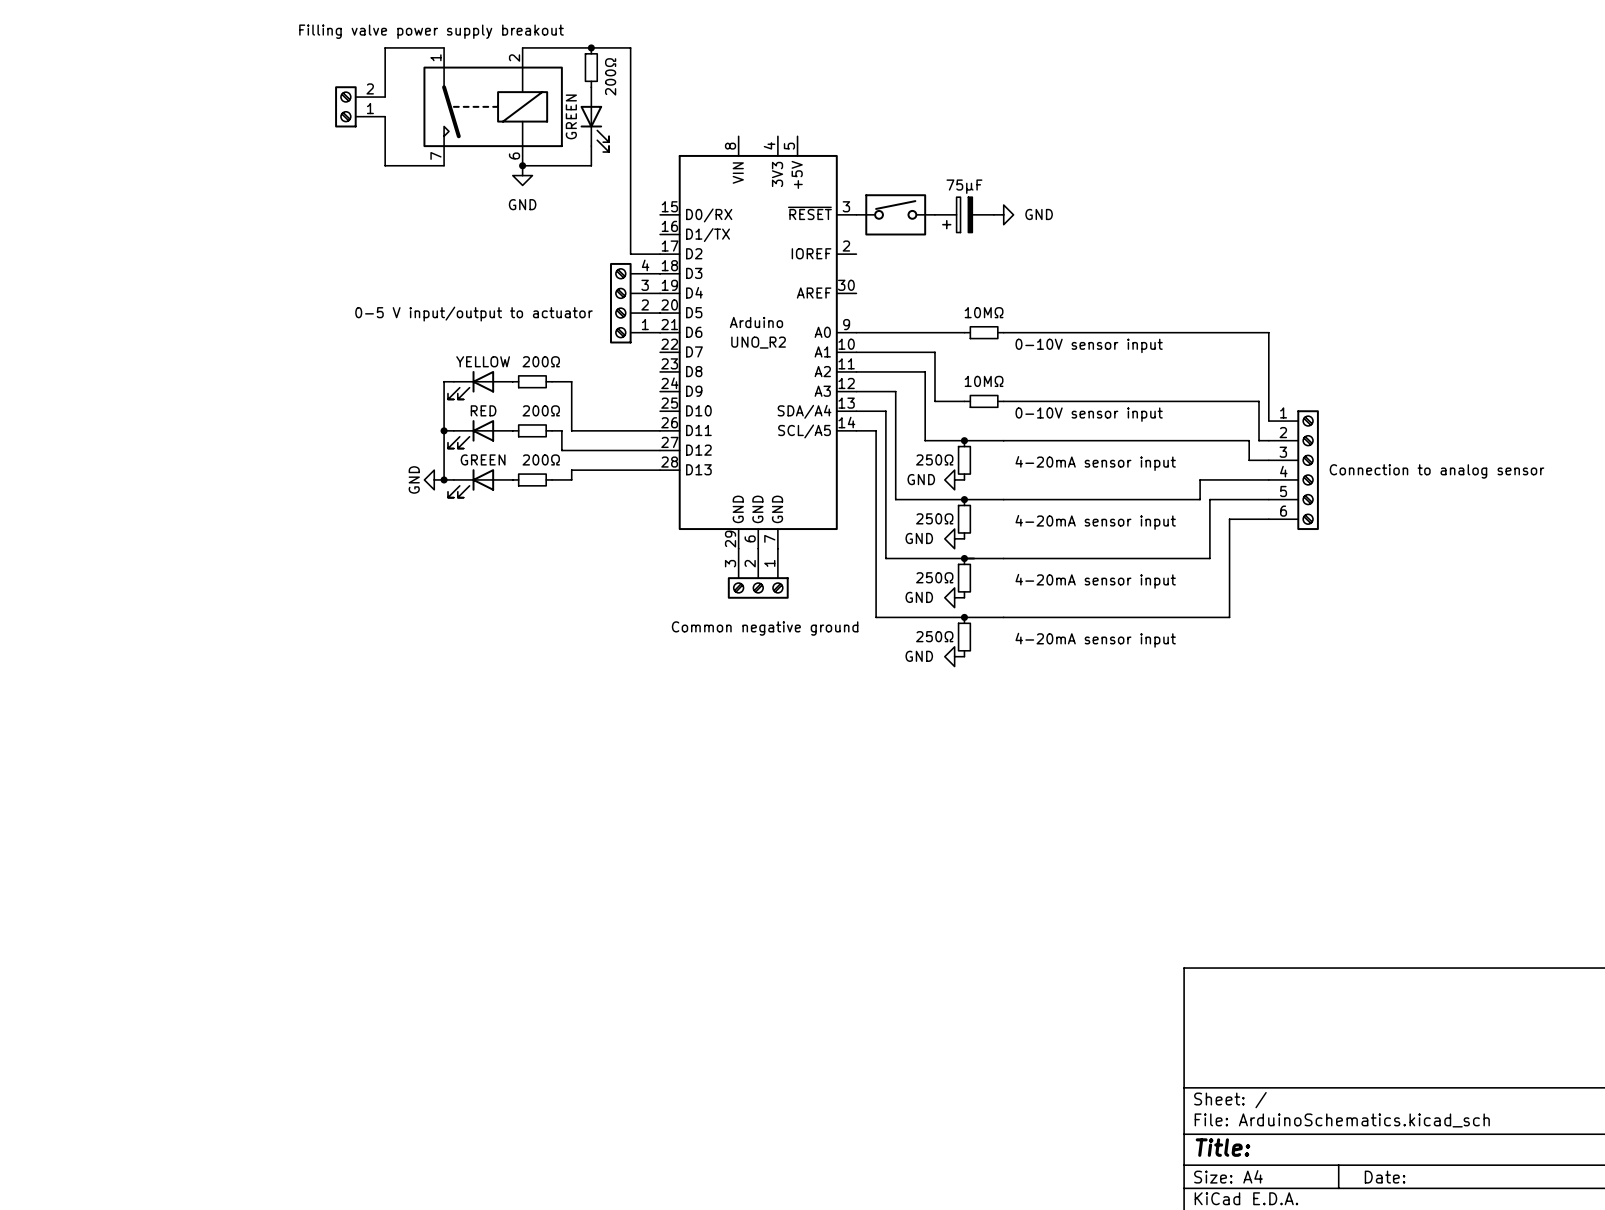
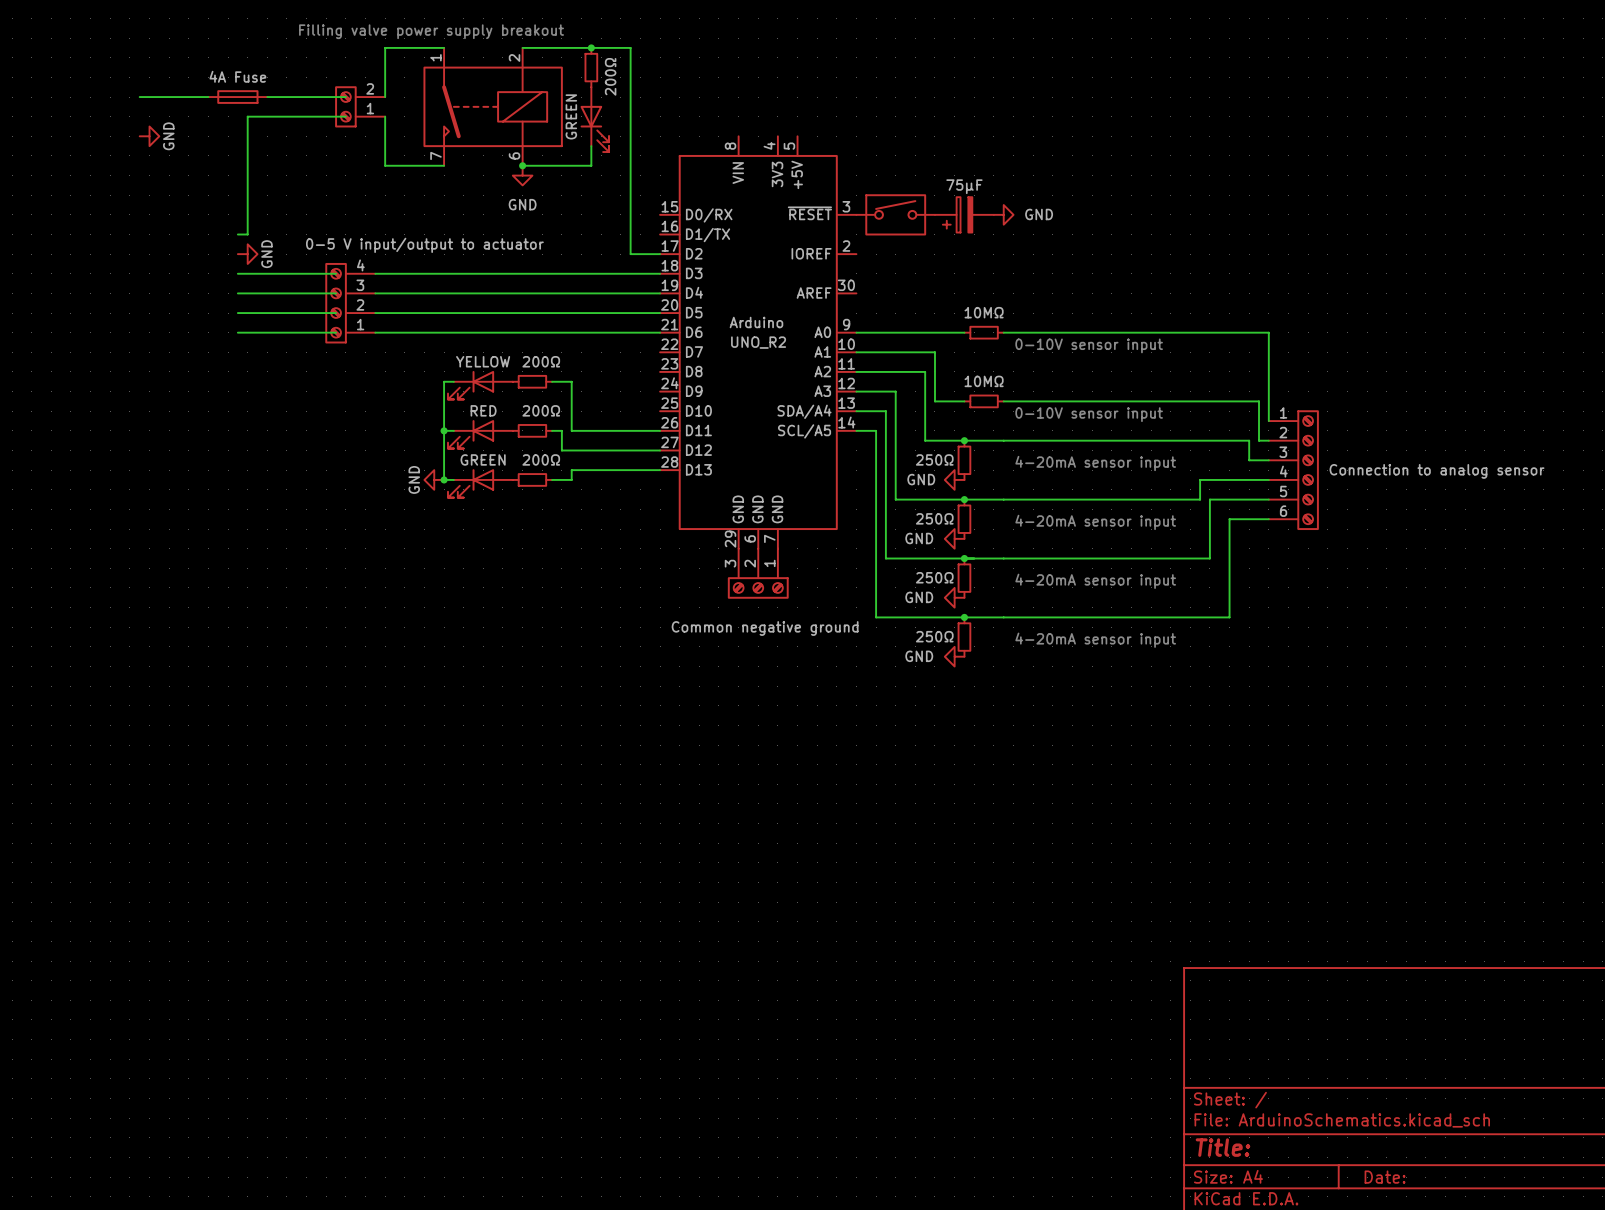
wire: none -> (139, 97) (208, 97)
part: none -> 4A Fuse (237, 97)
wire: none -> (267, 97) (345, 97)
wire: none -> (345, 116) (247, 116) (247, 234) (237, 234)
power symbol: none -> GND (149, 136)
power symbol: none -> GND (247, 254)
wire: none -> (237, 273) (336, 273)
wire: none -> (375, 273) (660, 273)
wire: none -> (237, 293) (336, 293)
wire: none -> (375, 293) (660, 293)
part: none -> 0-5 V input/output to actuator (350, 303)
part: 0-5 V input/output to actuator (635, 303) -> none
wire: none -> (237, 313) (336, 313)
wire: none -> (375, 313) (660, 313)
wire: none -> (237, 332) (336, 332)
wire: none -> (375, 332) (660, 332)

